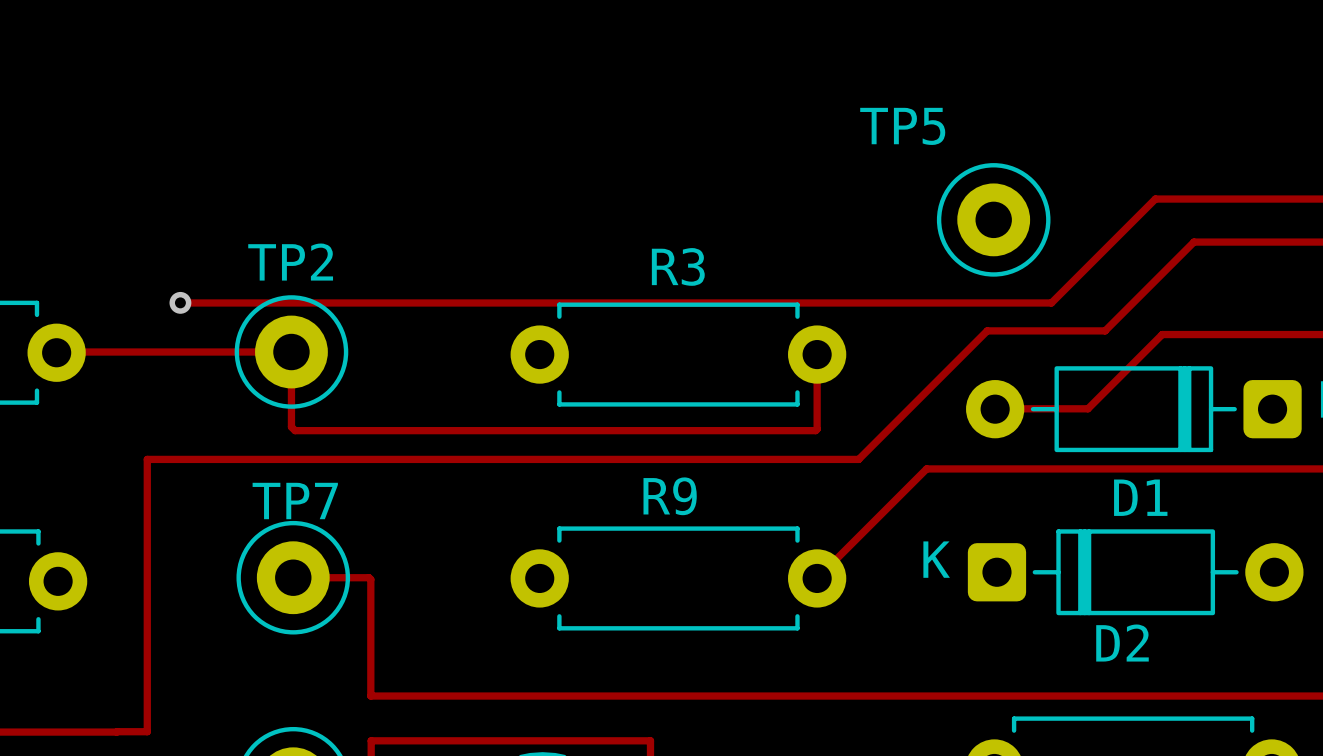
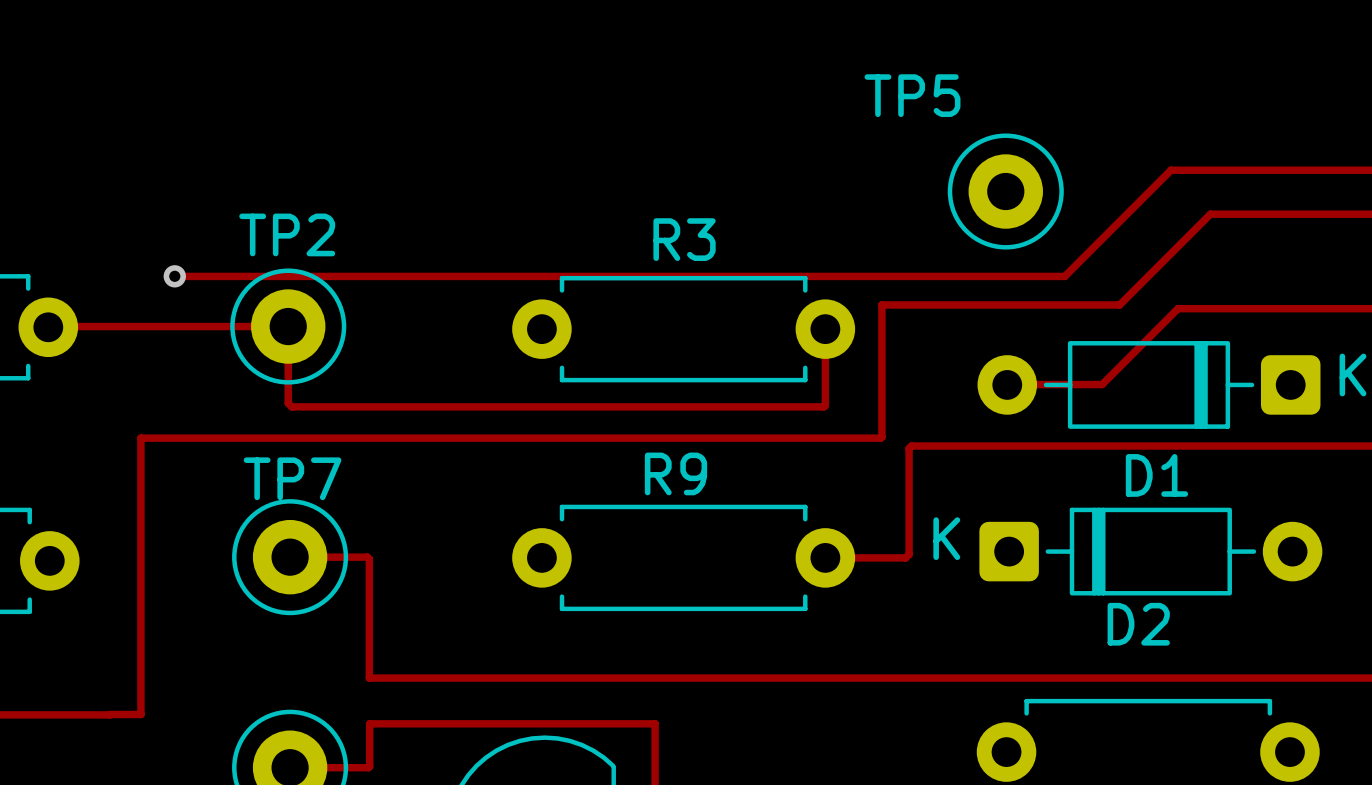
track: (987, 330) (858, 459) (147, 459) (147, 461) -> (999, 304) (881, 304) (880, 438) (140, 438)
track: (926, 468) (817, 578) -> (937, 446) (911, 446) (909, 448) (909, 554) (905, 557) (825, 557)

